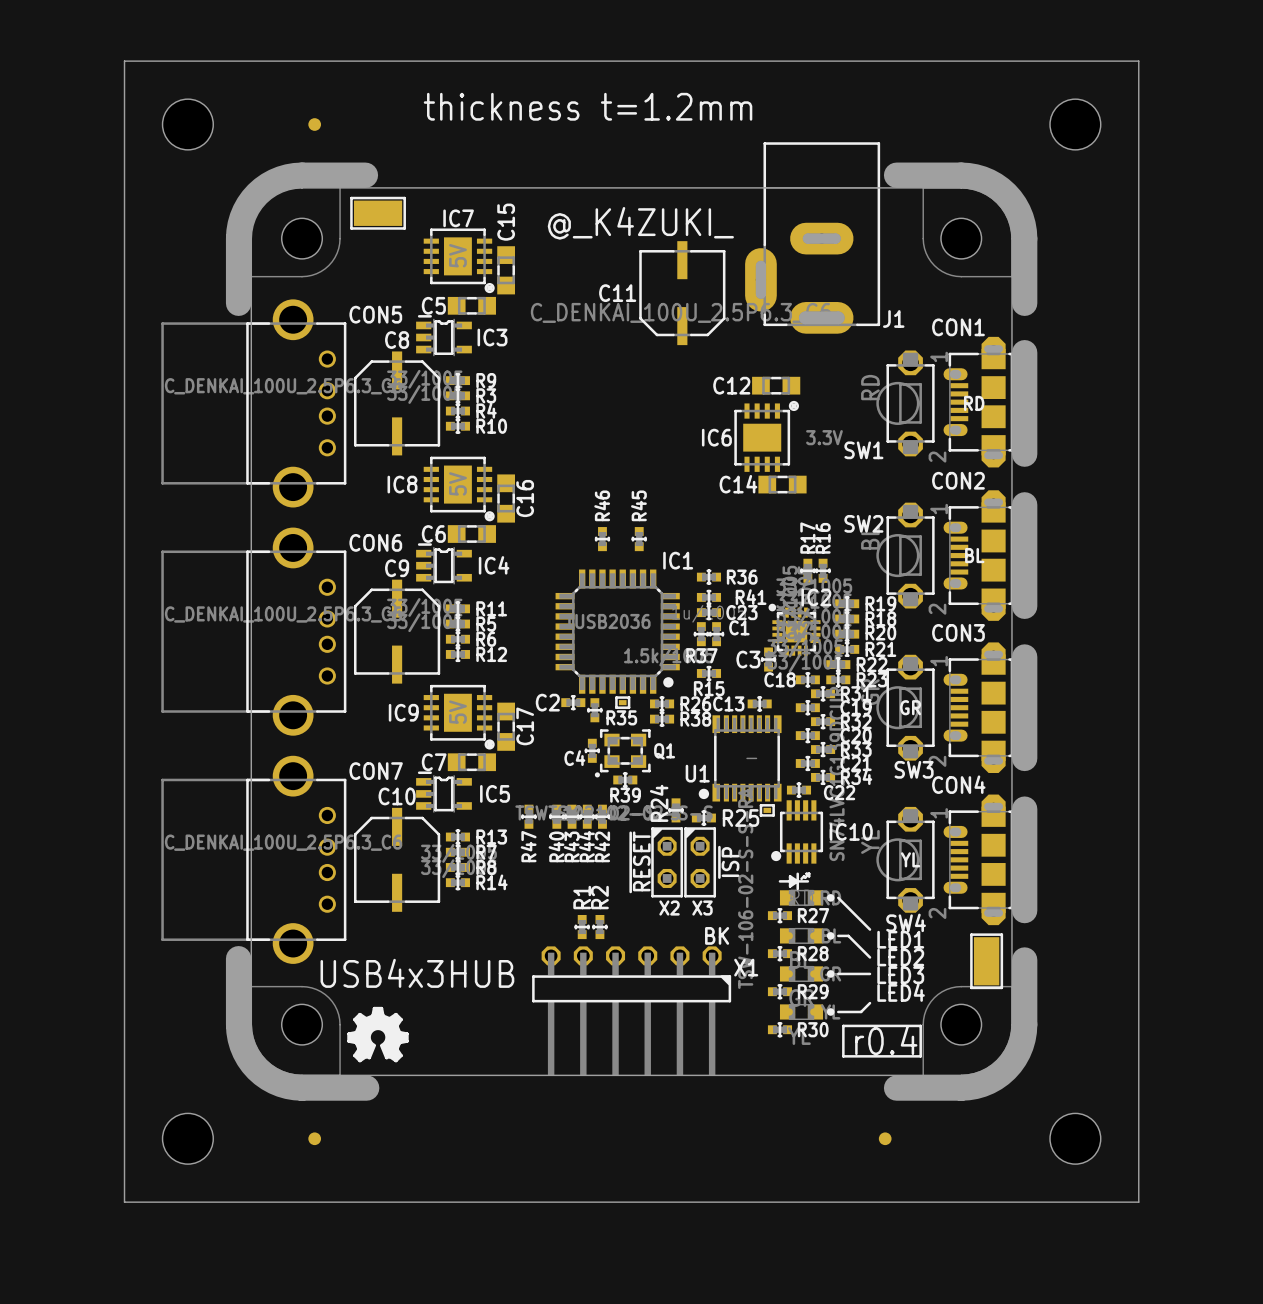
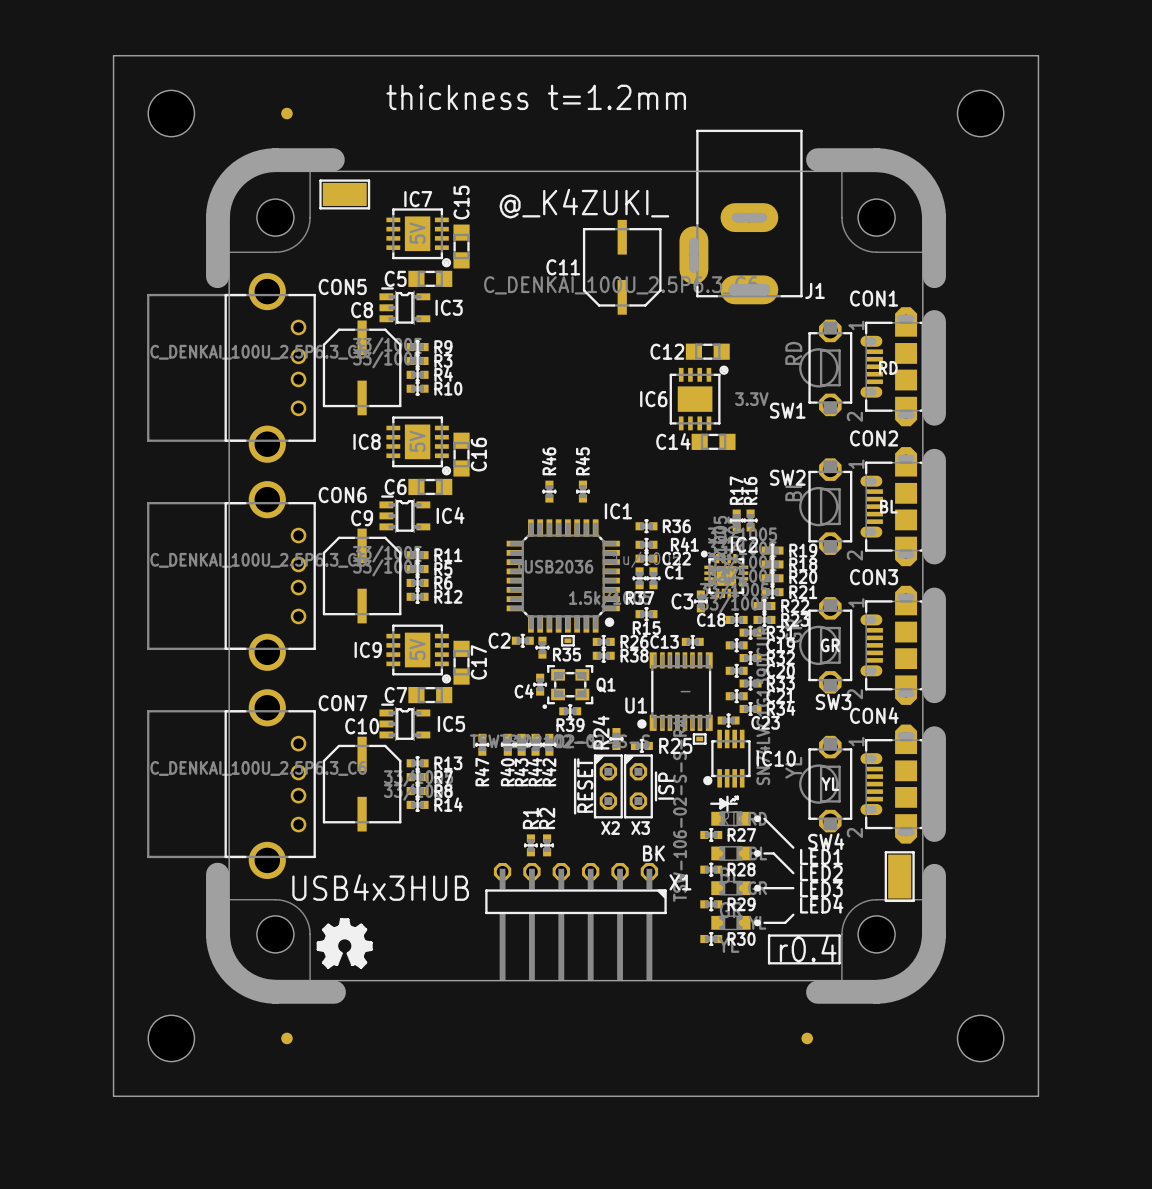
C23 name: C23 (741, 612) -> C22 (676, 558)
C22 name: C22 (839, 792) -> C23 (765, 722)

